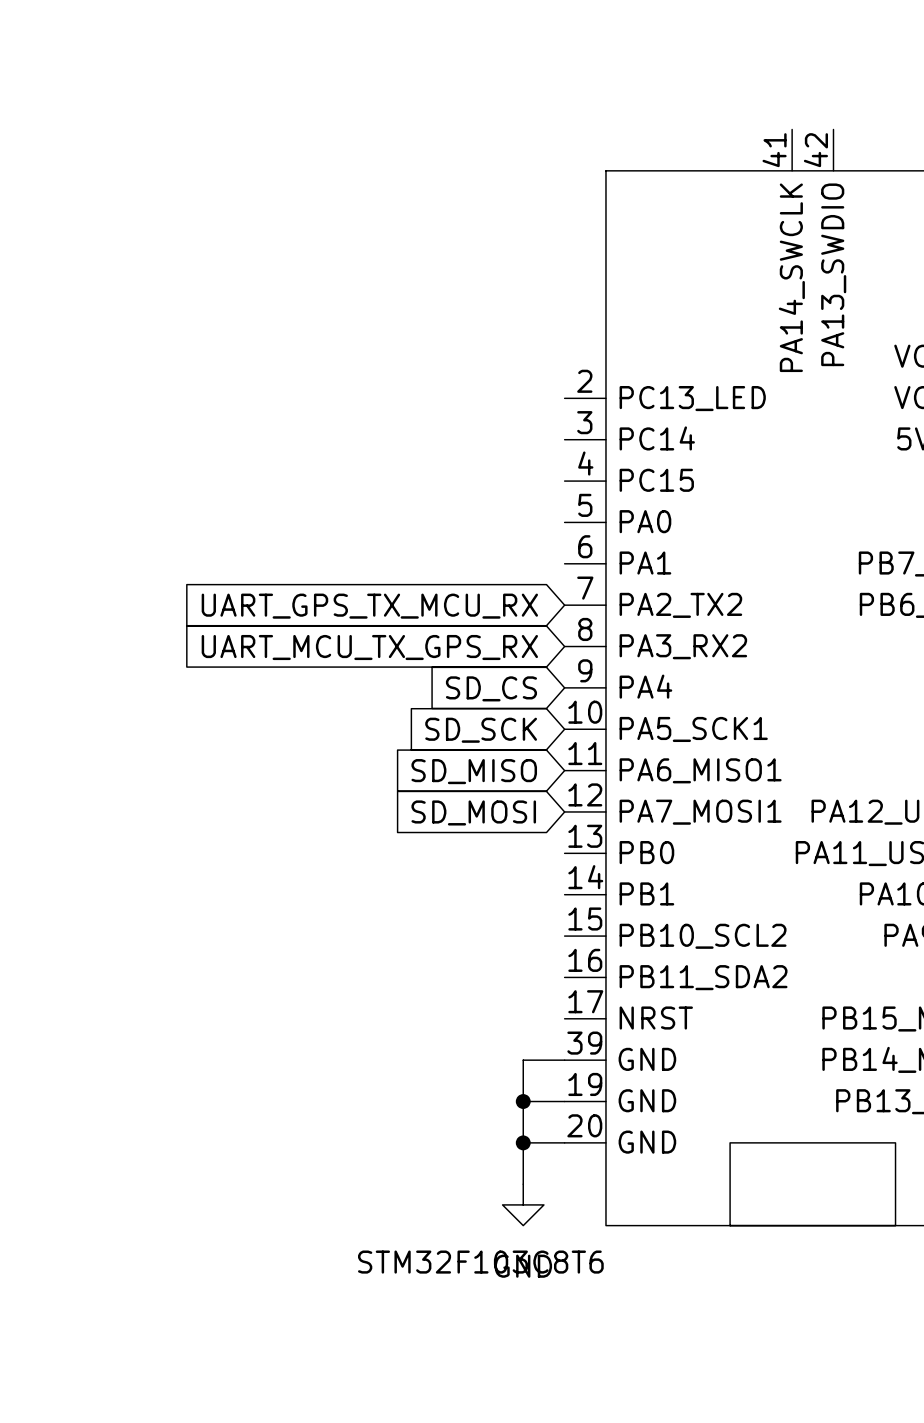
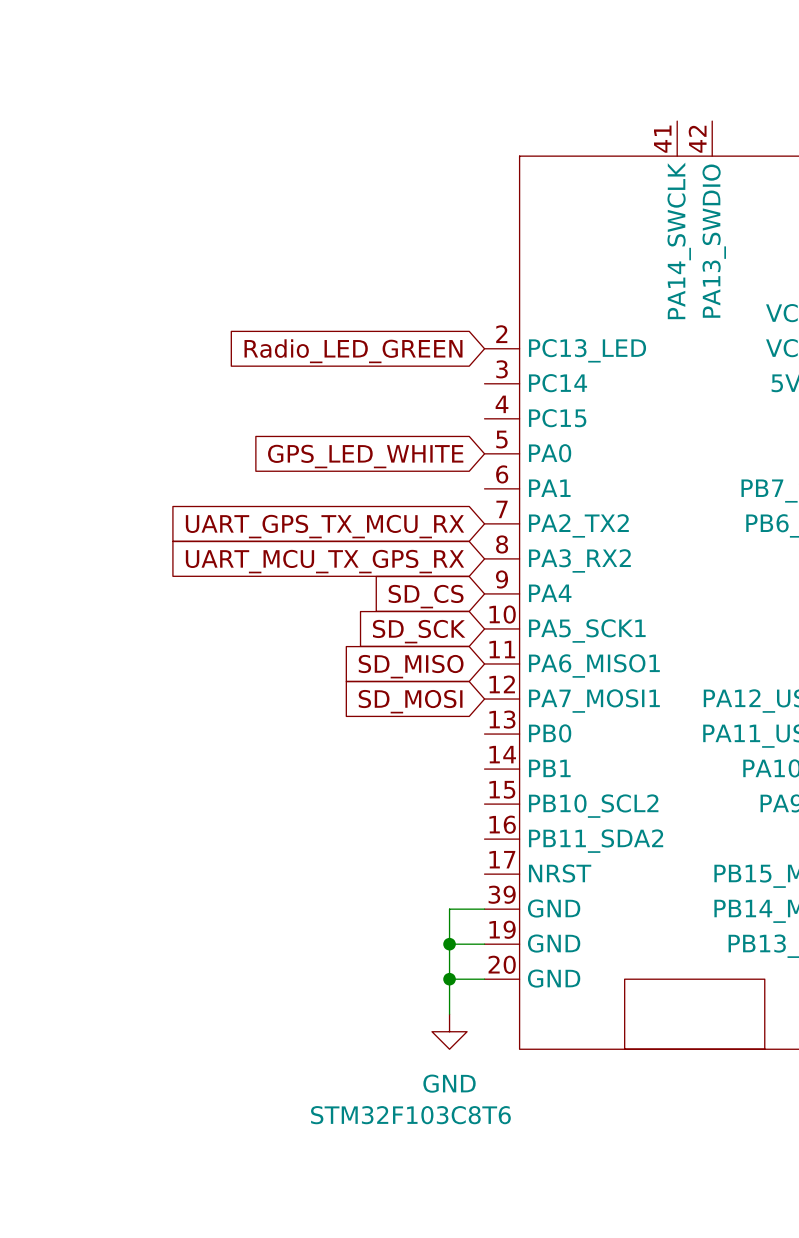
global label: none -> Radio_LED_GREEN (353, 351)
global label: none -> GPS_LED_WHITE (365, 456)
part value position: STM32F103C8T6 (480, 1262) -> STM32F103C8T6 (410, 1115)

